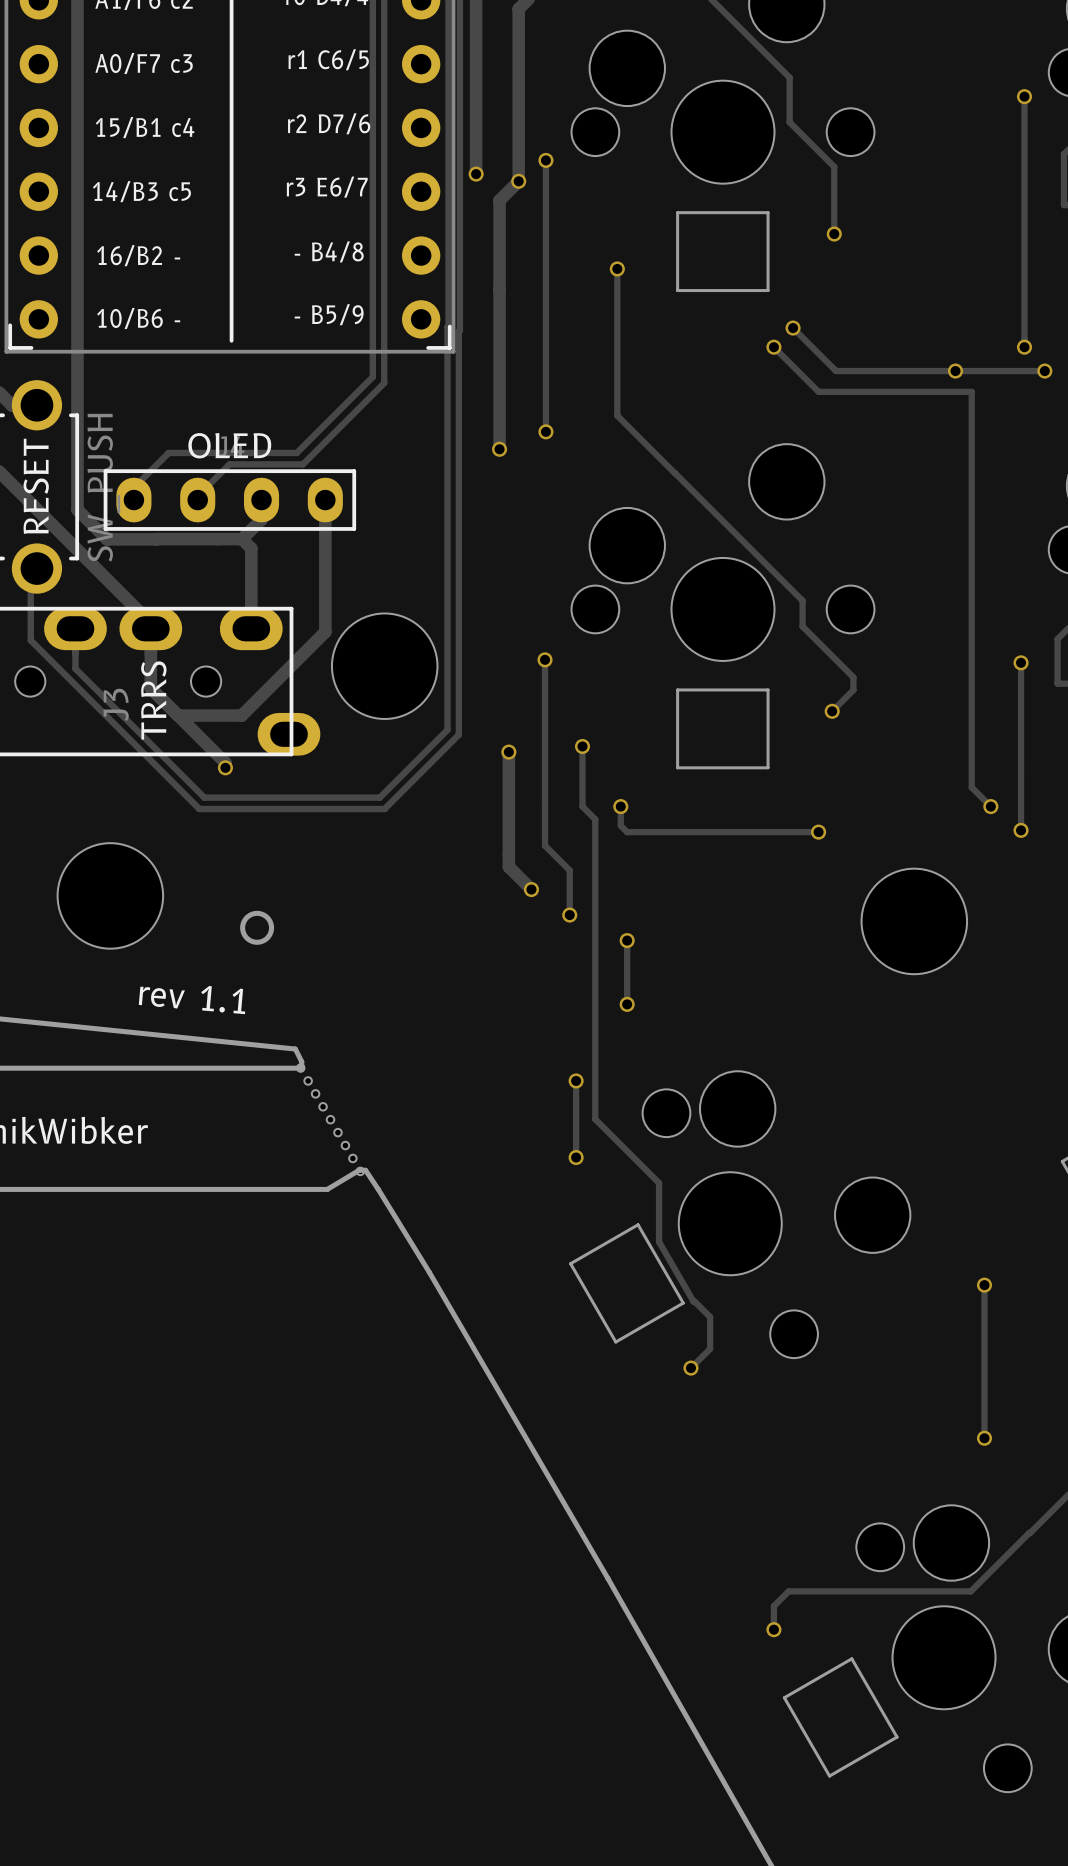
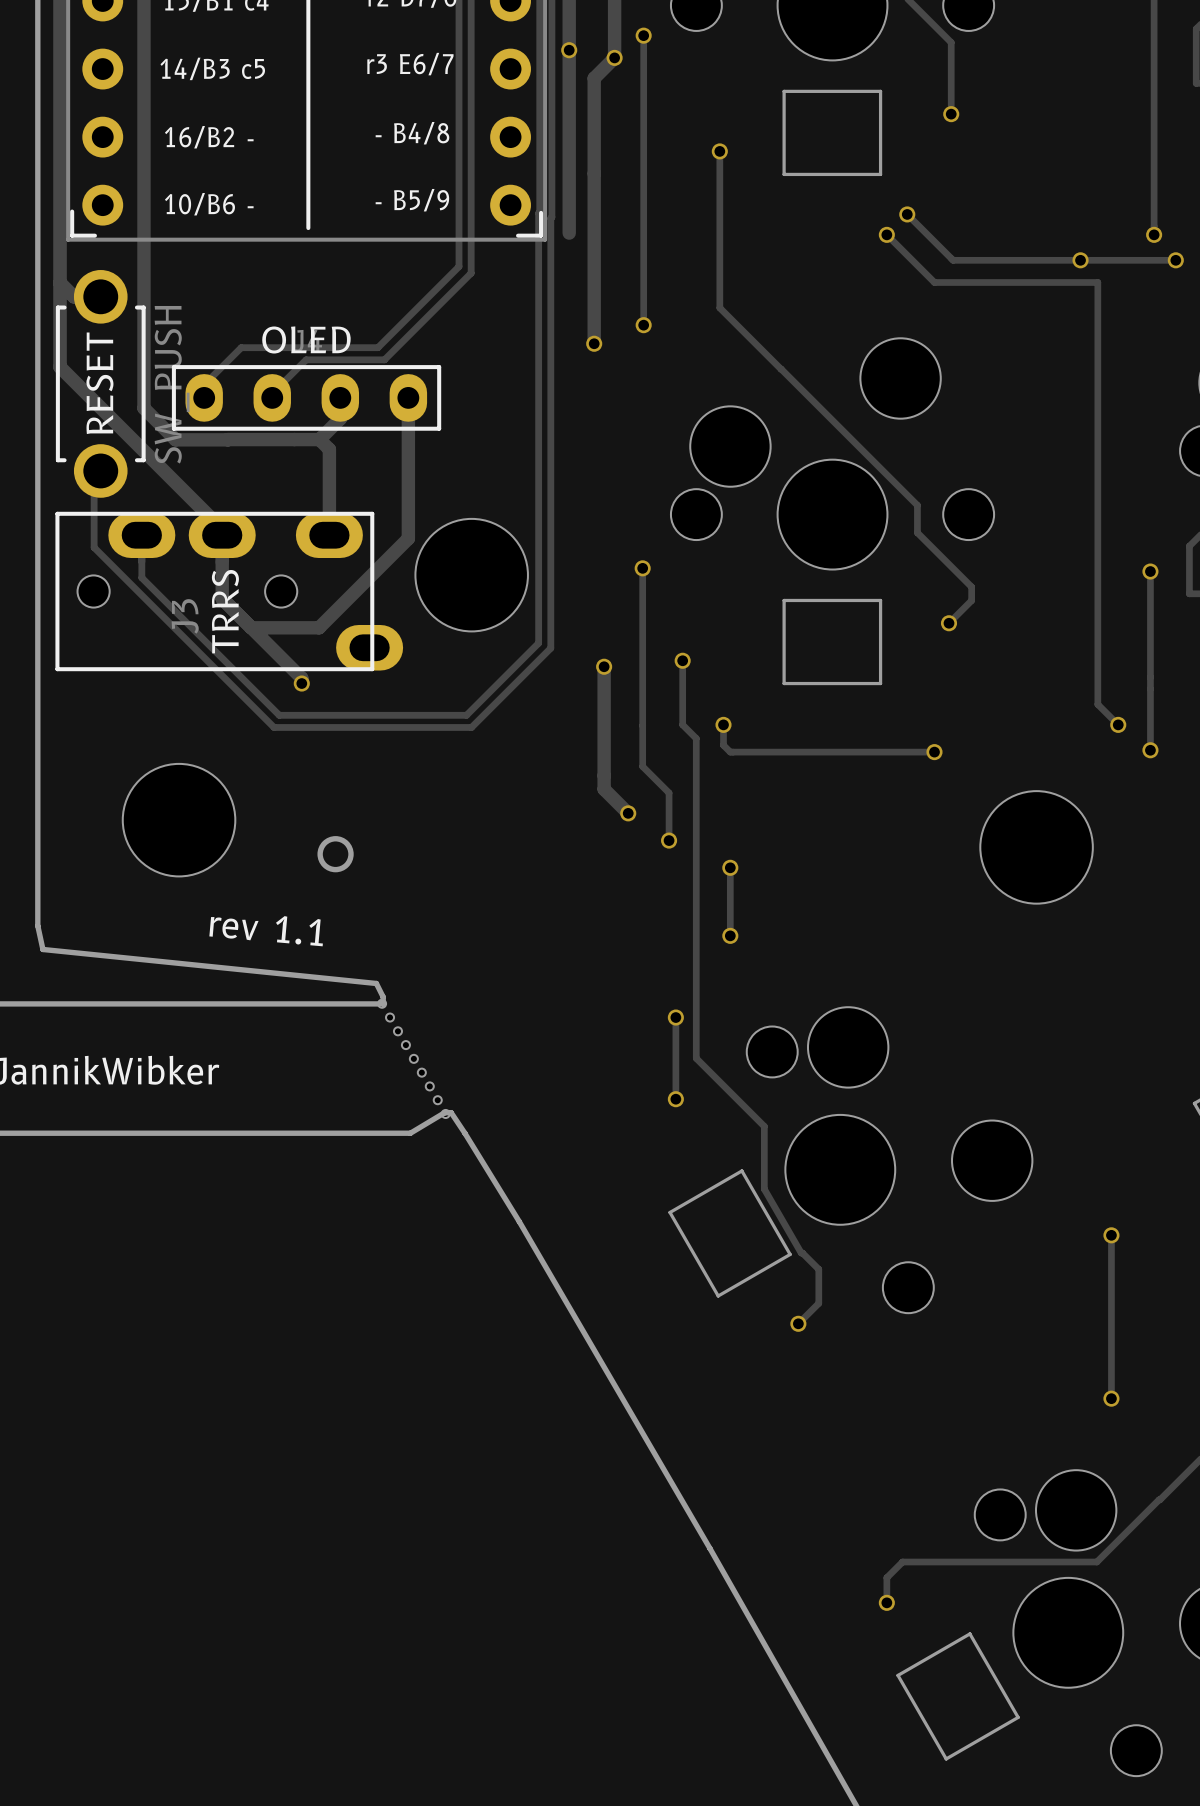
track: none -> (569, 50) (569, 233)

